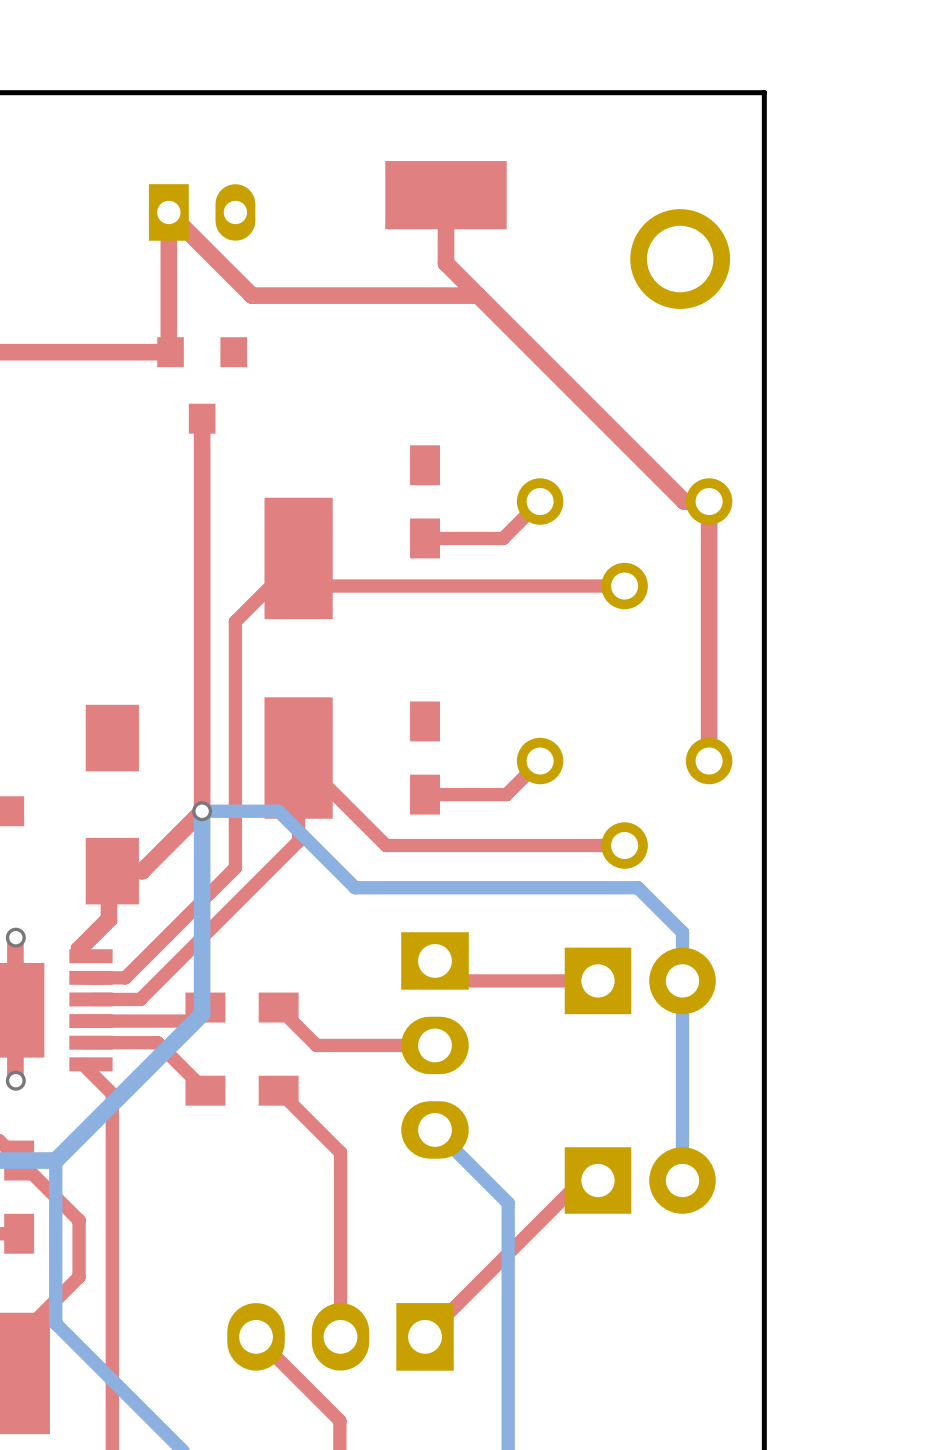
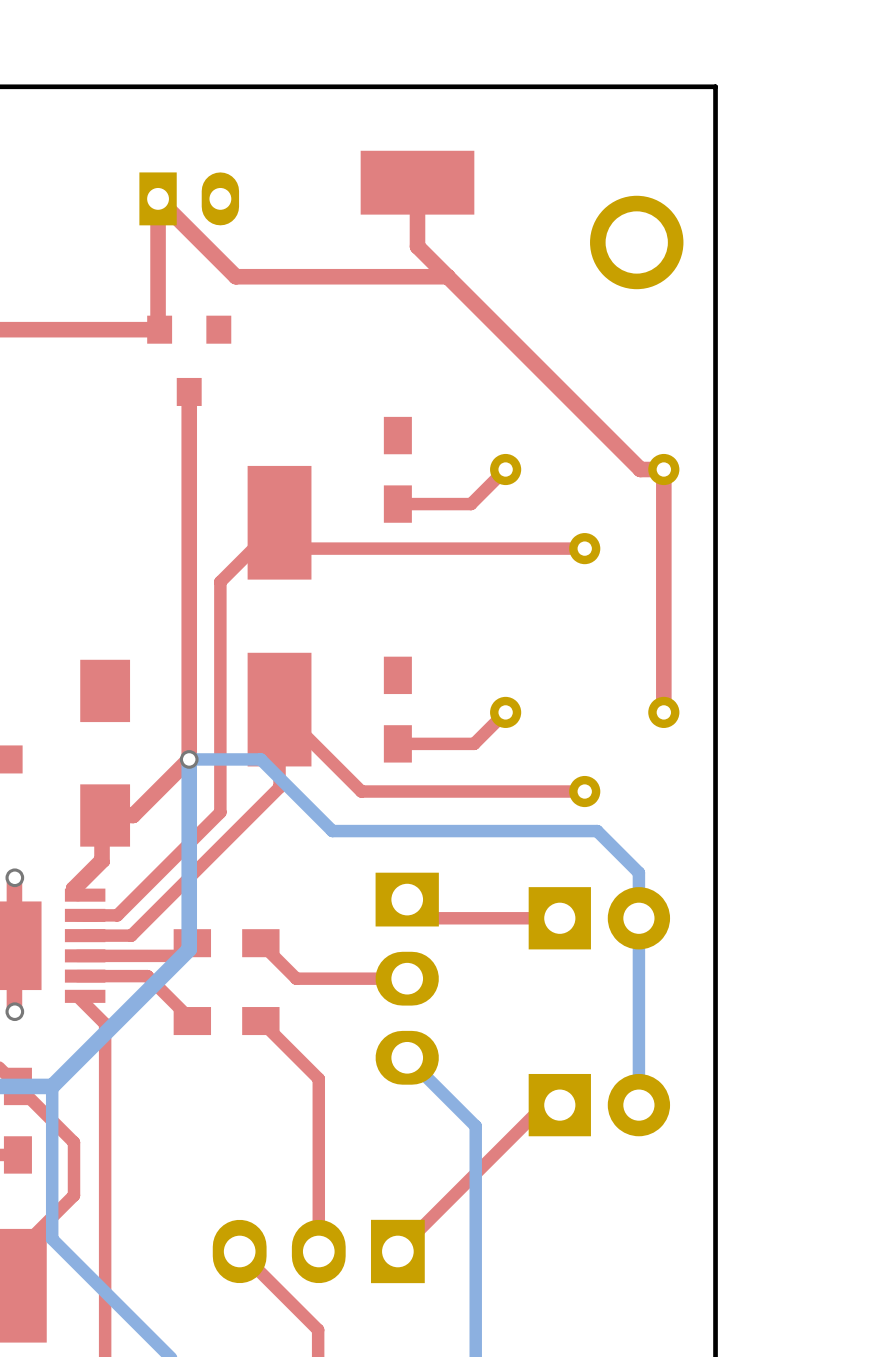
part footprint: [516, 478, 733, 610] -> [490, 453, 680, 565]
part footprint: [516, 737, 733, 869] -> [490, 696, 680, 808]

